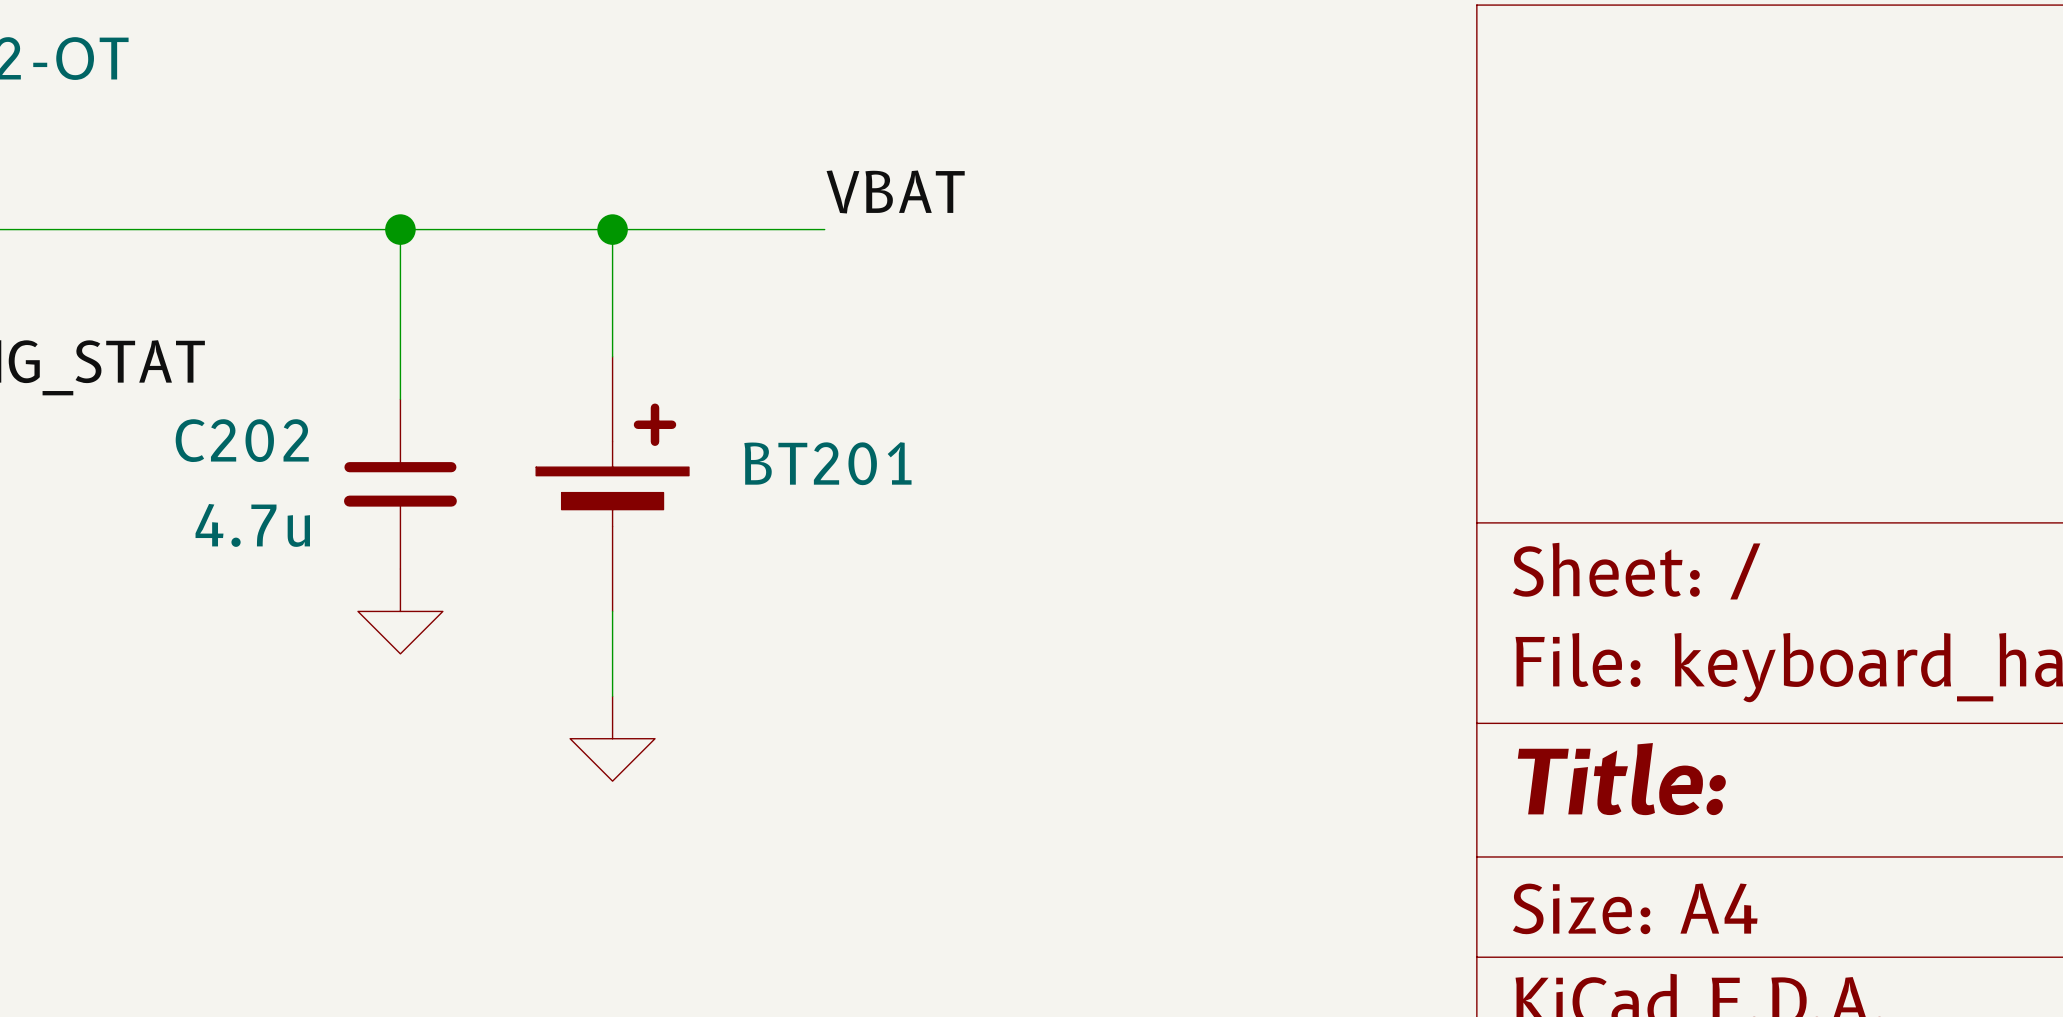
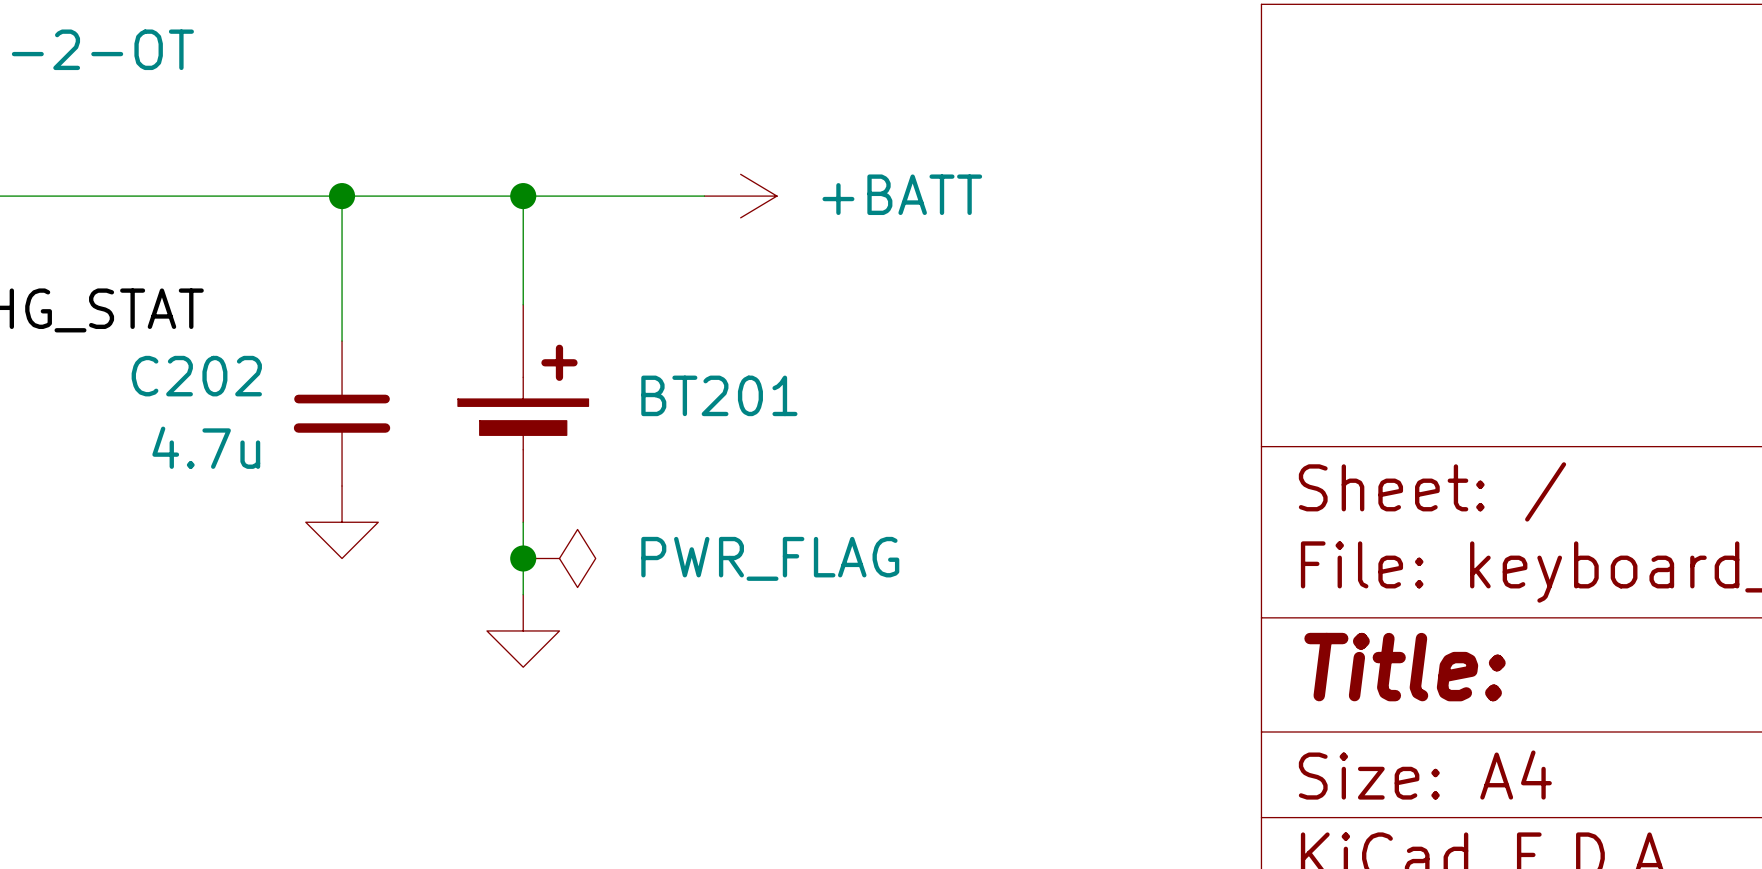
label: VBAT (895, 191) -> none
power symbol: none -> +BATT (740, 196)
junction: none -> (523, 558)
power symbol: none -> PWR_FLAG (559, 558)

